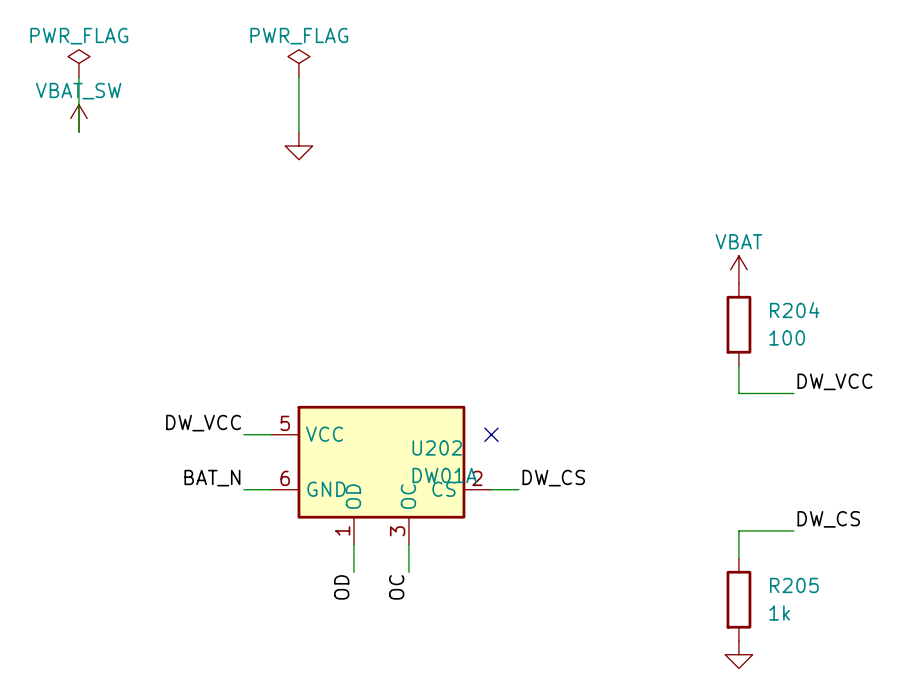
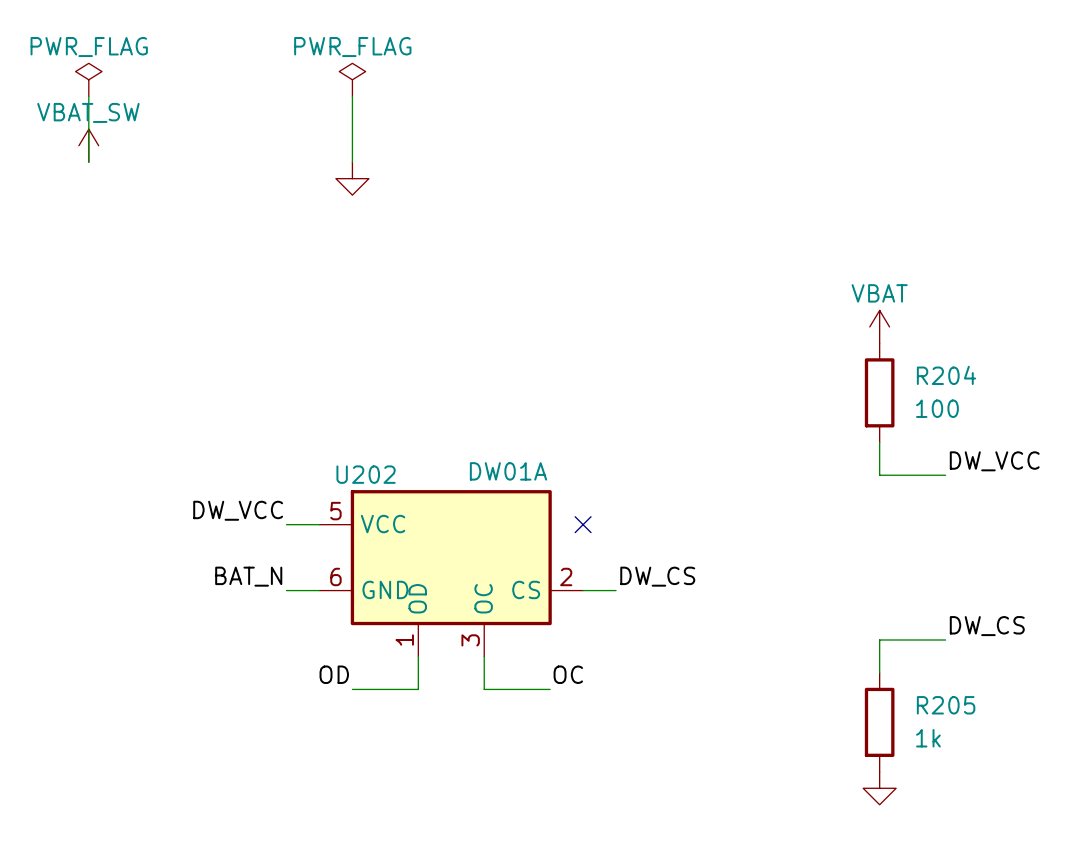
U202 name position: U202 (437, 447) -> U202 (366, 474)
U202 value position: DW01A (444, 475) -> DW01A (508, 471)
wire: none -> (352, 689) (418, 689)
wire: none -> (484, 689) (550, 689)
label rotation: 0° (341, 587) -> 90° clockwise (334, 674)
label position: OD (341, 587) -> OD (334, 674)
label rotation: 0° (396, 587) -> 90° clockwise (568, 674)
label position: OC (396, 587) -> OC (568, 674)

